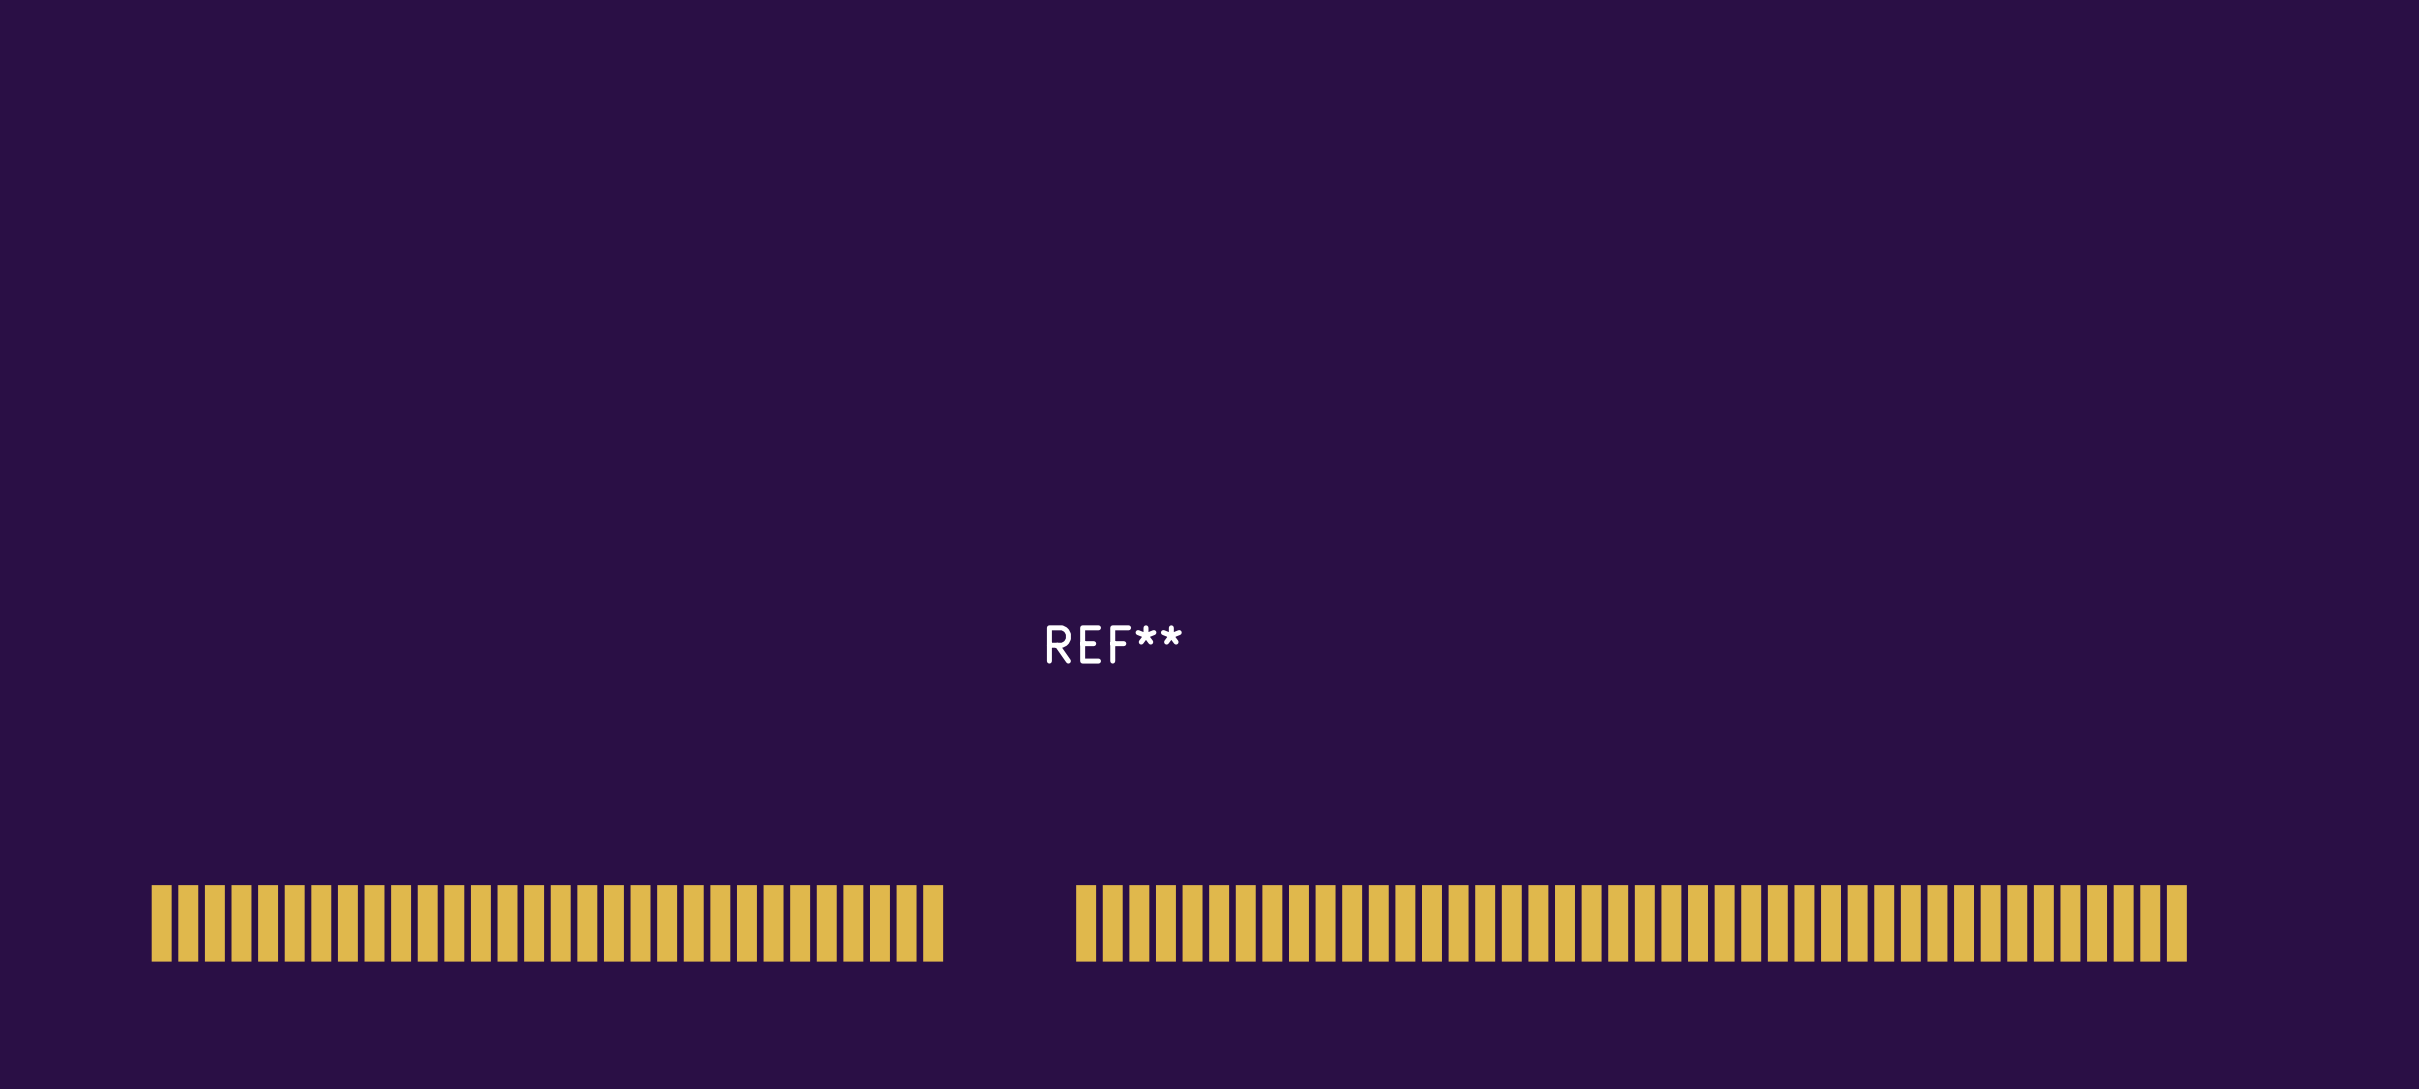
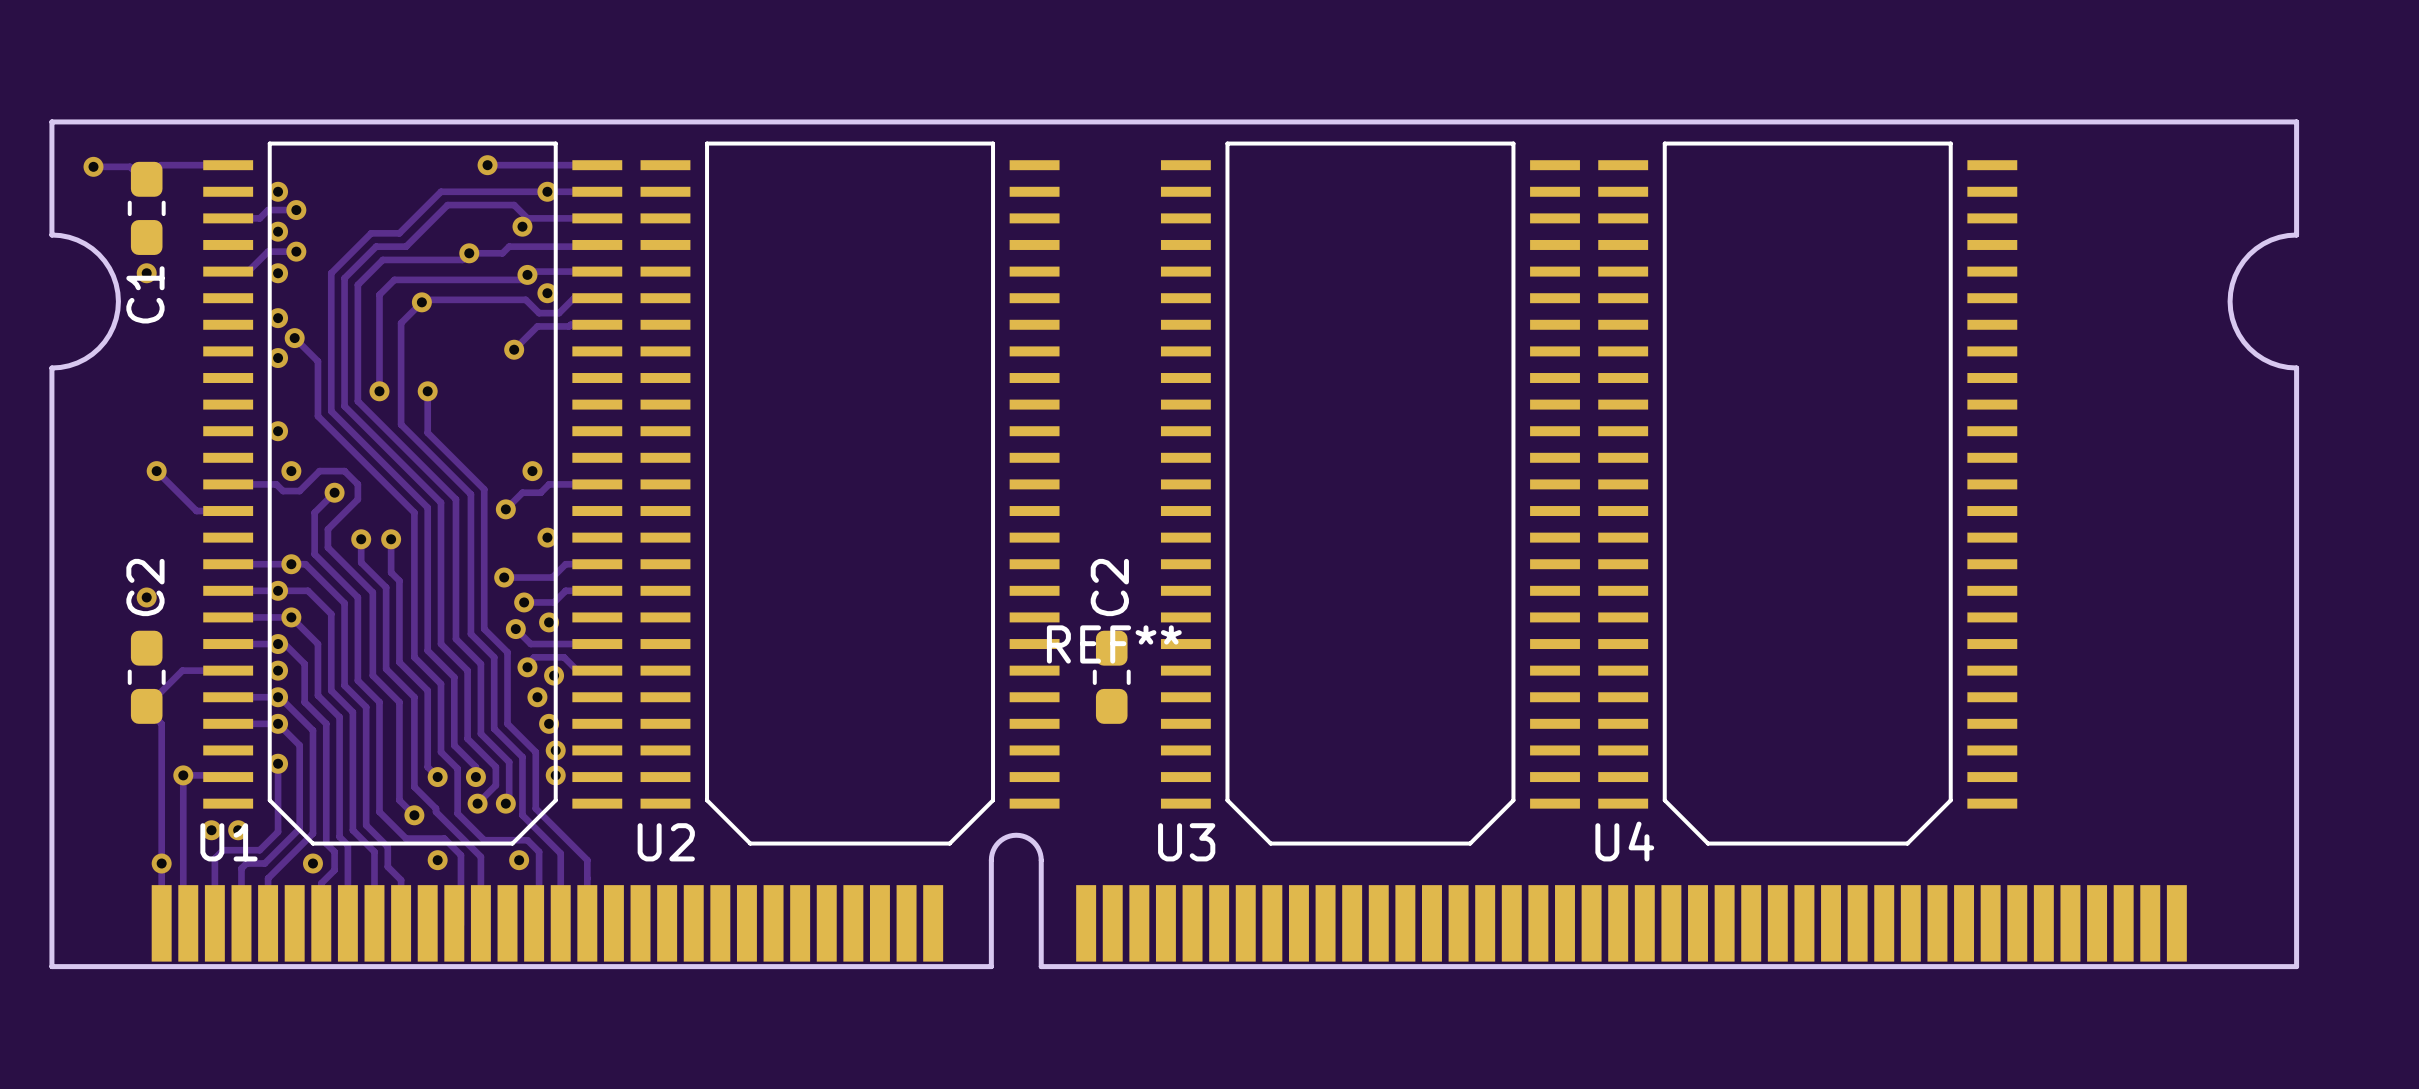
board edge: none -> (51, 121) (51, 235) (77, 240) (98, 254) (113, 276) (118, 301) (113, 326) (98, 348) (77, 362) (51, 368) (51, 966) (991, 966) (991, 856) (998, 842) (1006, 837) (1016, 835) (1025, 837) (1033, 842) (1041, 856) (1041, 966) (2296, 966) (2296, 368) (2271, 362) (2249, 348) (2235, 326) (2230, 301) (2235, 276) (2249, 254) (2271, 240) (2296, 235) (2296, 121) (51, 121)
track: none -> (228, 165) (160, 165) (146, 179) (142, 179) (130, 166) (93, 166)
track: none -> (487, 165) (597, 165)
via: none -> (487, 165)
via: none -> (93, 166)
via: none -> (278, 191)
via: none -> (547, 191)
track: none -> (597, 191) (441, 191) (399, 233) (371, 233) (331, 273) (331, 411) (427, 507) (427, 650) (454, 677) (454, 745) (475, 767) (475, 777)
C1: none -> (146, 208)
track: none -> (296, 210) (268, 210) (259, 218) (228, 218)
via: none -> (296, 210)
track: none -> (527, 218) (597, 218)
track: none -> (527, 218) (514, 205) (447, 205) (406, 246) (376, 246) (344, 278) (344, 406) (441, 502) (441, 644) (467, 670) (467, 738) (495, 767) (495, 785) (477, 803)
via: none -> (522, 226)
via: none -> (278, 231)
track: none -> (597, 244) (595, 246) (509, 246) (502, 253) (469, 253) (462, 259) (382, 259) (357, 284) (357, 401) (455, 499) (455, 639) (480, 663) (480, 733) (509, 762) (509, 800) (505, 803)
track: none -> (296, 251) (268, 251) (248, 271) (228, 271)
via: none -> (296, 251)
via: none -> (469, 253)
track: none -> (597, 271) (530, 271) (522, 279) (394, 279) (379, 294) (379, 391)
via: none -> (146, 273)
via: none -> (278, 273)
via: none -> (527, 274)
via: none -> (547, 293)
track: none -> (597, 298) (574, 298) (559, 313) (539, 313) (525, 299) (424, 299) (401, 323) (401, 424) (470, 494) (470, 634) (494, 657) (494, 728) (522, 757) (522, 815) (560, 853) (560, 923)
via: none -> (421, 302)
via: none -> (278, 318)
track: none -> (597, 324) (537, 326) (514, 349)
track: none -> (294, 338) (317, 361) (317, 416) (414, 512) (414, 657) (441, 683) (441, 752) (457, 768) (457, 813) (484, 840) (527, 840) (539, 851) (539, 888) (534, 893) (534, 923)
via: none -> (294, 338)
via: none -> (514, 349)
via: none -> (278, 358)
via: none -> (379, 391)
track: none -> (427, 391) (427, 432) (484, 489) (484, 629) (507, 652) (507, 723) (535, 752) (535, 808) (587, 860) (587, 923)
via: none -> (427, 391)
via: none -> (278, 431)
track: none -> (156, 471) (196, 511) (228, 511)
via: none -> (156, 471)
via: none -> (291, 471)
via: none -> (532, 471)
track: none -> (228, 484) (276, 484) (283, 491) (299, 491) (319, 471) (344, 471) (357, 484) (357, 499) (327, 529) (327, 547) (372, 592) (372, 675) (399, 702) (399, 800) (414, 815)
track: none -> (597, 484) (549, 484) (540, 492) (522, 492) (505, 509)
track: none -> (334, 492) (314, 512) (314, 554) (357, 597) (357, 680) (379, 702) (379, 811) (406, 838) (444, 838) (460, 855) (460, 925)
via: none -> (334, 492)
U1: none -> (412, 493)
U2: none -> (850, 493)
U3: none -> (1370, 493)
U4: none -> (1807, 493)
via: none -> (505, 509)
via: none -> (547, 537)
track: none -> (361, 539) (361, 562) (386, 587) (386, 668) (414, 697) (414, 787) (436, 808) (436, 811) (480, 856) (480, 923)
via: none -> (361, 539)
track: none -> (391, 539) (391, 572) (399, 580) (399, 662) (427, 690) (427, 767) (437, 777)
via: none -> (391, 539)
track: none -> (228, 564) (305, 564) (344, 603) (344, 685) (366, 707) (366, 825) (387, 846) (387, 866) (401, 880) (401, 923)
via: none -> (291, 564)
track: none -> (597, 564) (565, 564) (552, 577) (504, 577)
via: none -> (504, 577)
track: none -> (228, 590) (307, 590) (331, 614) (331, 690) (352, 712) (352, 830) (374, 851) (374, 923)
via: none -> (278, 590)
track: none -> (597, 590) (565, 590) (554, 602) (524, 602)
via: none -> (146, 597)
via: none -> (524, 602)
track: none -> (228, 617) (291, 617) (317, 644) (317, 695) (339, 717) (339, 836) (347, 845) (347, 923)
via: none -> (291, 617)
via: none -> (549, 622)
track: none -> (515, 629) (530, 644) (597, 644)
via: none -> (515, 629)
track: none -> (228, 644) (284, 644) (304, 663) (304, 702) (326, 723) (326, 843) (334, 851) (334, 870) (321, 883) (321, 923)
via: none -> (278, 644)
track: none -> (527, 667) (527, 663) (534, 657) (564, 657) (577, 670) (597, 670)
via: none -> (527, 667)
track: none -> (228, 670) (182, 670) (146, 706) (146, 708) (161, 723) (161, 923)
via: none -> (278, 670)
via: none -> (554, 675)
C2: none -> (146, 677)
C2: none -> (1111, 677)
track: none -> (228, 697) (279, 697) (312, 730) (312, 833) (268, 878) (268, 923)
via: none -> (278, 697)
via: none -> (537, 697)
track: none -> (228, 723) (278, 723) (299, 745) (299, 828) (264, 863) (246, 863) (241, 868) (241, 923)
via: none -> (278, 723)
via: none -> (549, 723)
via: none -> (555, 750)
track: none -> (278, 763) (278, 831) (259, 850) (223, 850) (214, 858) (214, 923)
via: none -> (278, 763)
via: none -> (183, 775)
via: none -> (555, 775)
track: none -> (228, 777) (226, 775) (183, 775) (183, 918) (188, 923)
via: none -> (437, 777)
via: none -> (475, 777)
via: none -> (477, 803)
via: none -> (505, 803)
via: none -> (414, 815)
via: none -> (211, 830)
via: none -> (238, 830)
via: none -> (437, 860)
via: none -> (519, 860)
via: none -> (161, 863)
via: none -> (312, 863)

